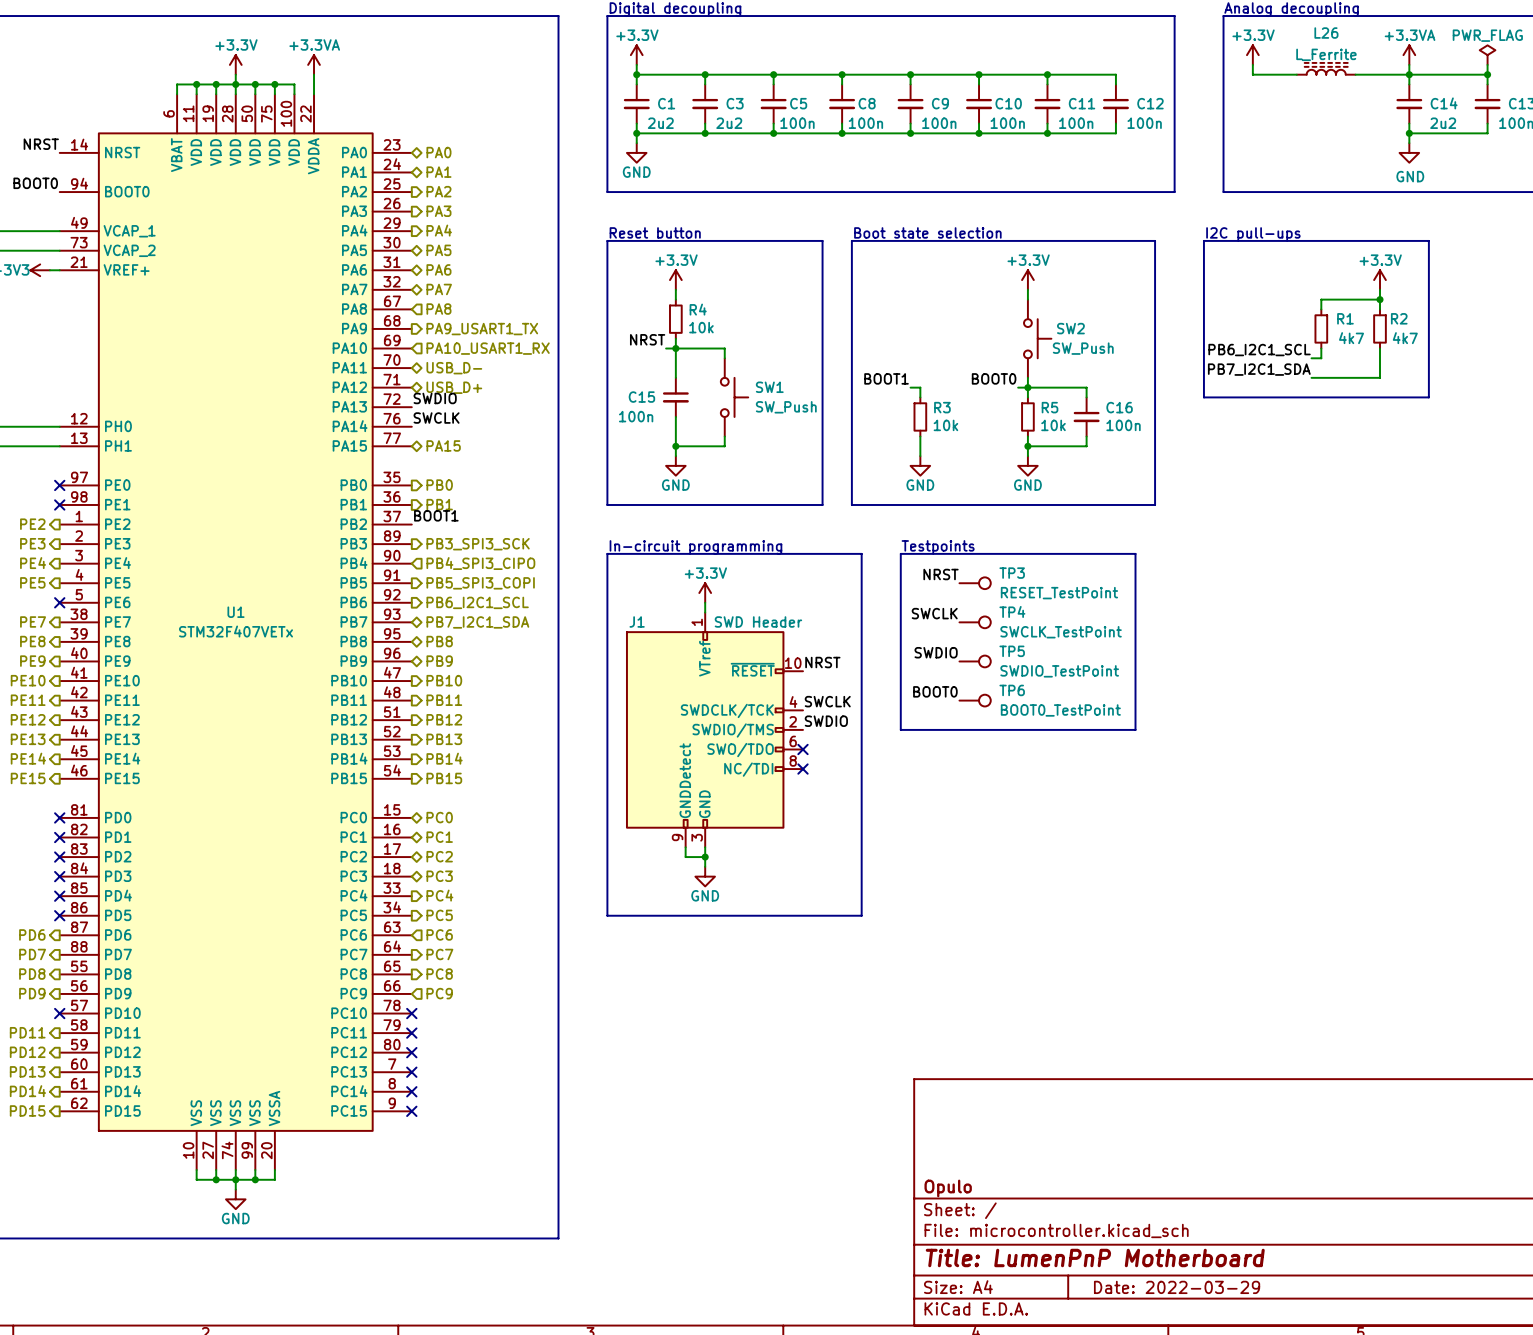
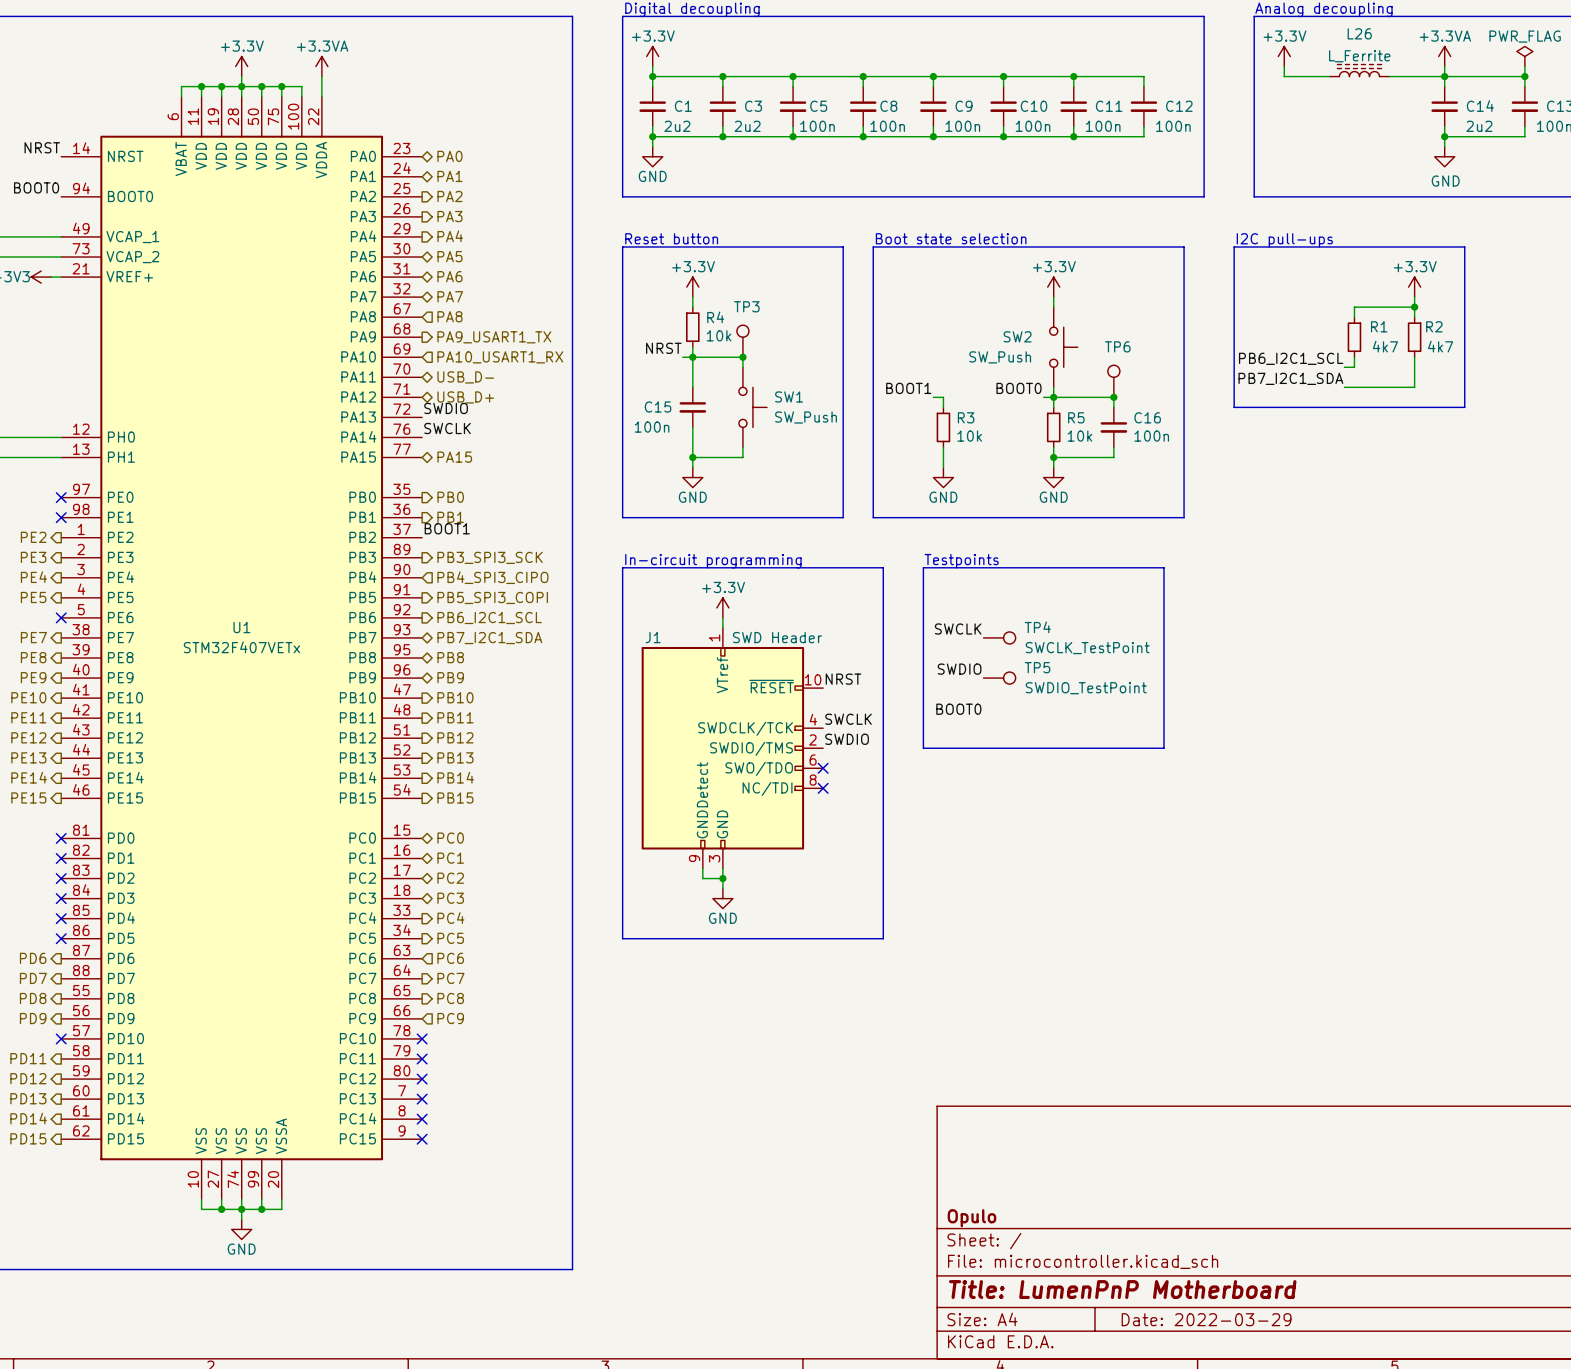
SW2 name position: SW2 (1070, 328) -> SW2 (1017, 336)
junction: none -> (742, 357)
SW2 value position: SW_Push (1083, 348) -> SW_Push (1000, 357)
junction: none -> (1113, 397)
TP3 name position: TP3 (1012, 573) -> TP3 (746, 306)
label: NRST (941, 574) -> none
TP3 position: (975, 583) -> (742, 341)
TP3 rotation: 0° (984, 583) -> 90° counterclockwise (742, 331)
TP3 value: RESET_TestPoint (1059, 593) -> none
TP6 name position: TP6 (1012, 690) -> TP6 (1117, 346)
TP6 position: (975, 700) -> (1113, 381)
TP6 rotation: 0° (984, 700) -> 90° counterclockwise (1113, 371)
TP6 value: BOOT0_TestPoint (1060, 710) -> none

